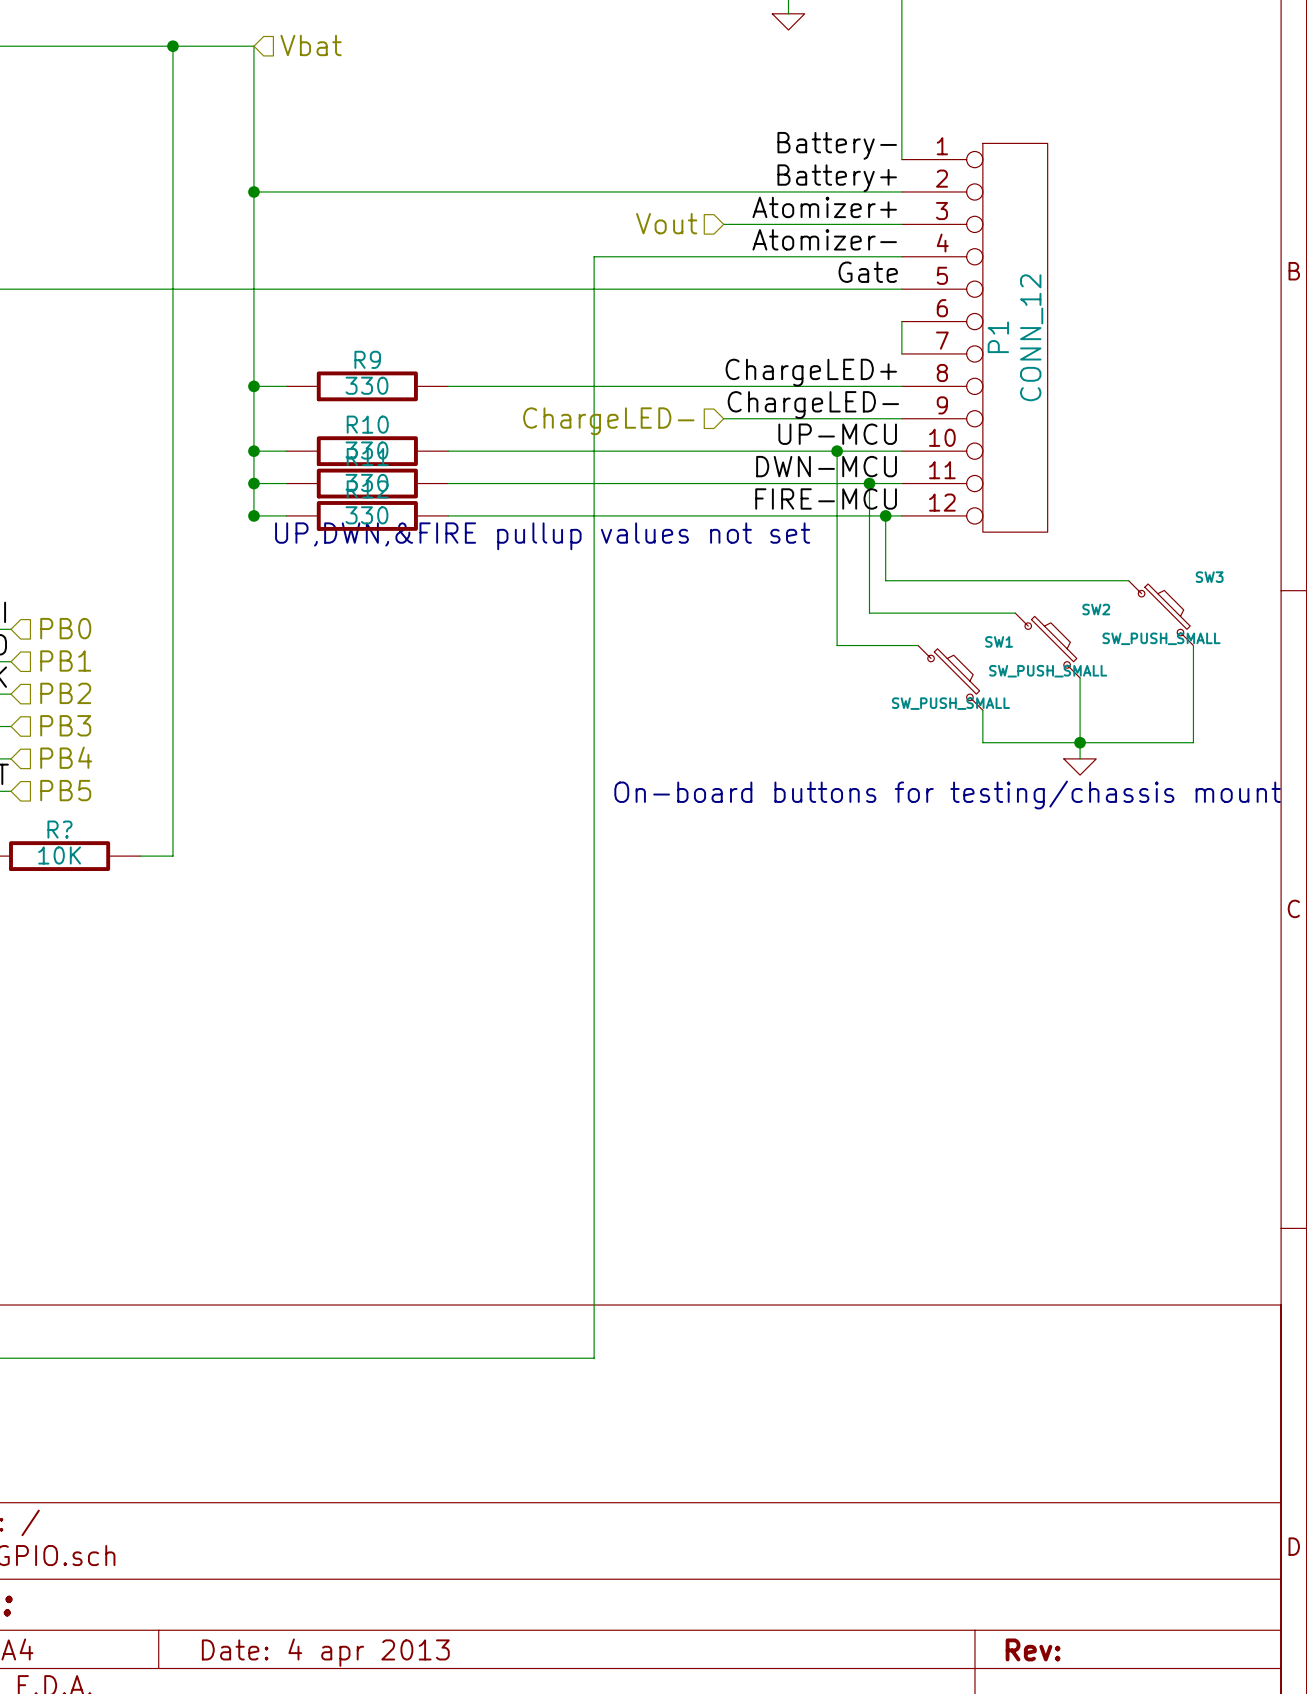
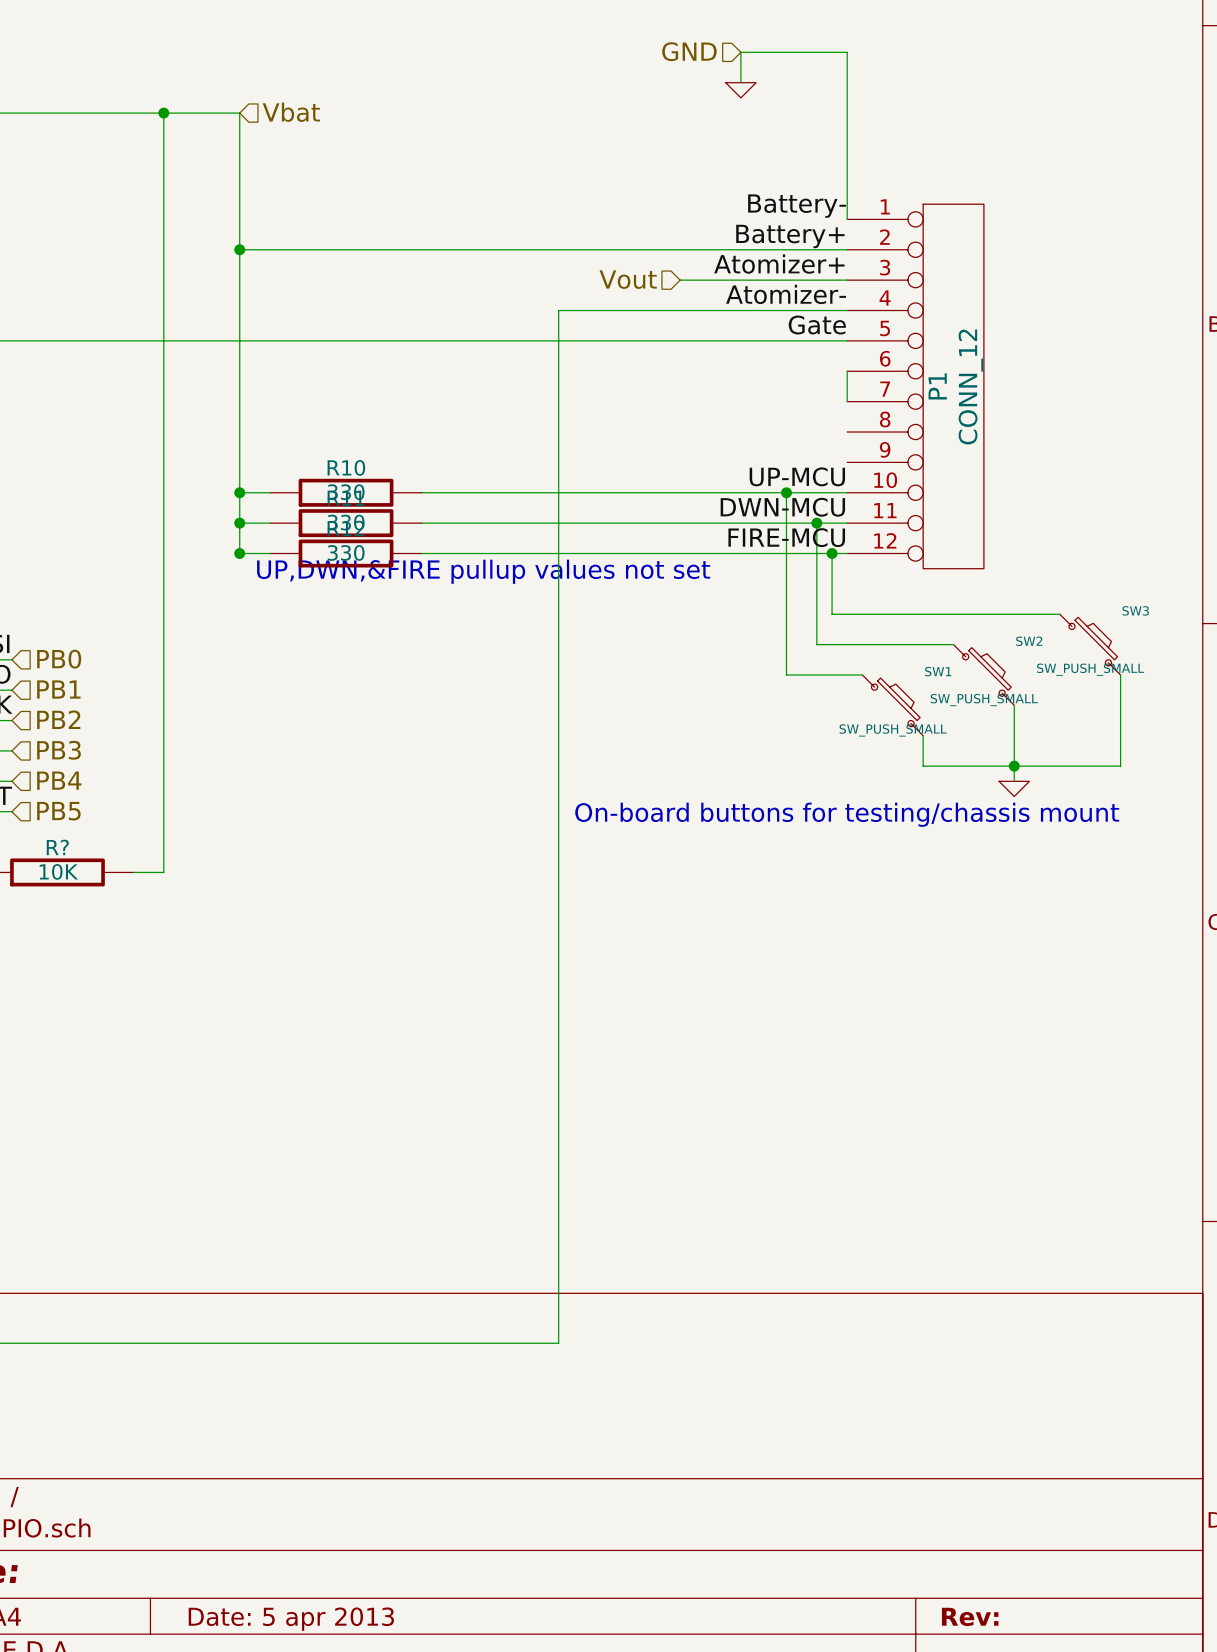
label: ChargeLED+ (811, 372) -> none
wire: (253, 386) (286, 386) -> none
junction: (253, 386) -> none
R9: 330 (367, 386) -> none
wire: (448, 386) (901, 386) -> none
label: ChargeLED- (813, 405) -> none
wire: (723, 418) (901, 418) -> none
hierarchical label: ChargeLED- (608, 421) -> none
title block: Date: 4 apr 2013 (325, 1652) -> Date: 5 apr 2013 (291, 1619)

